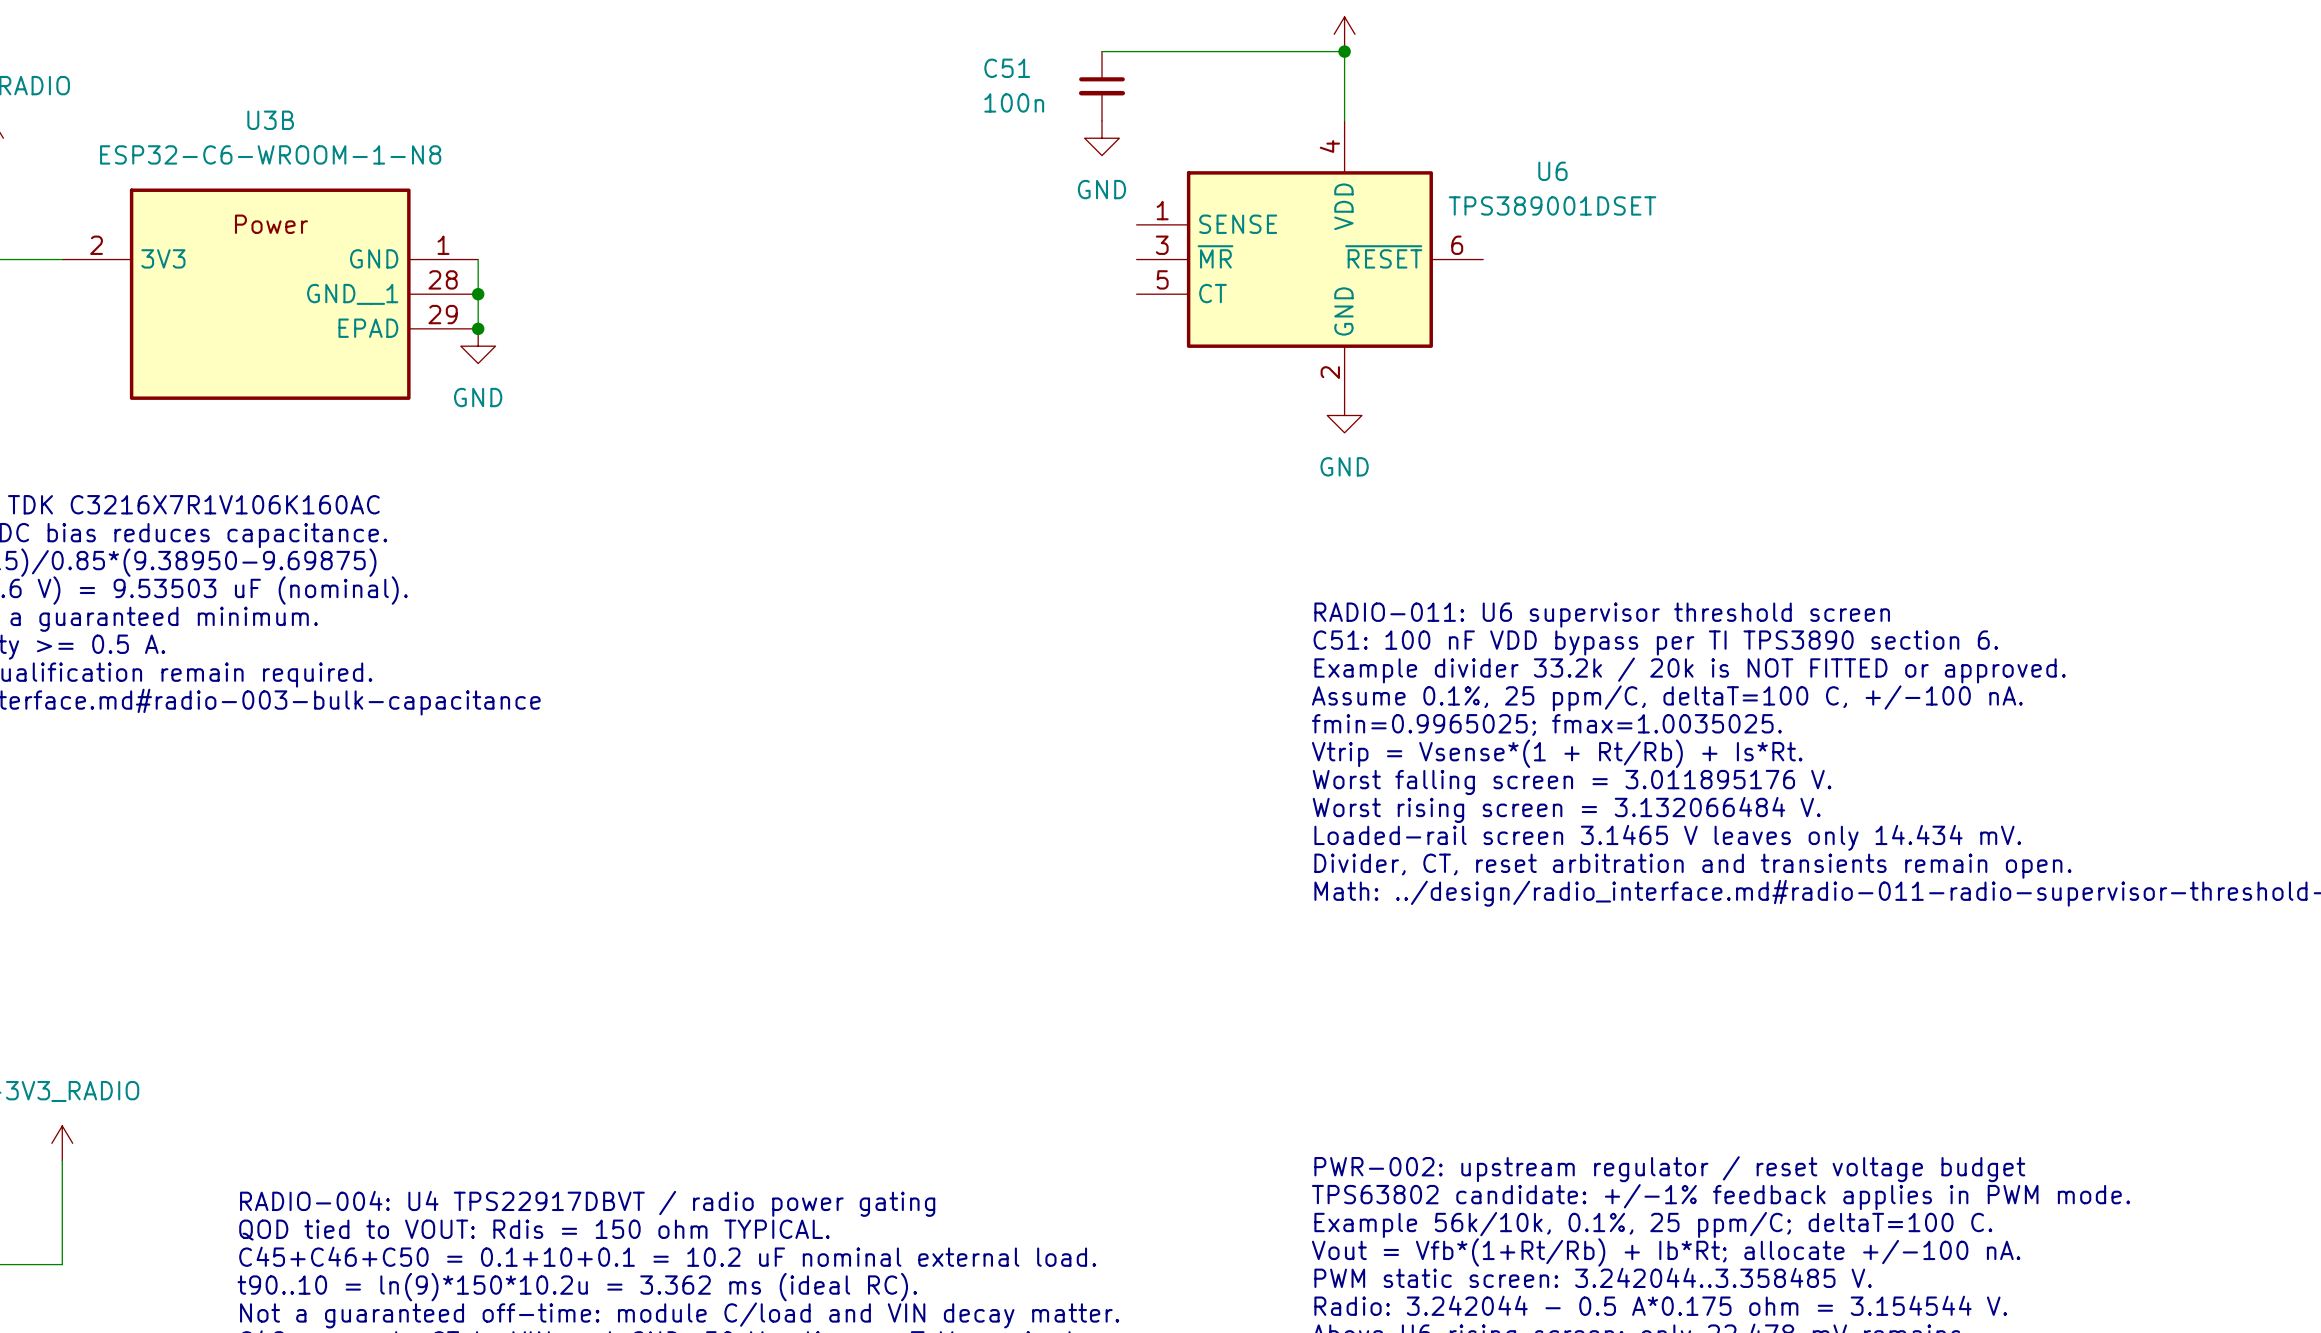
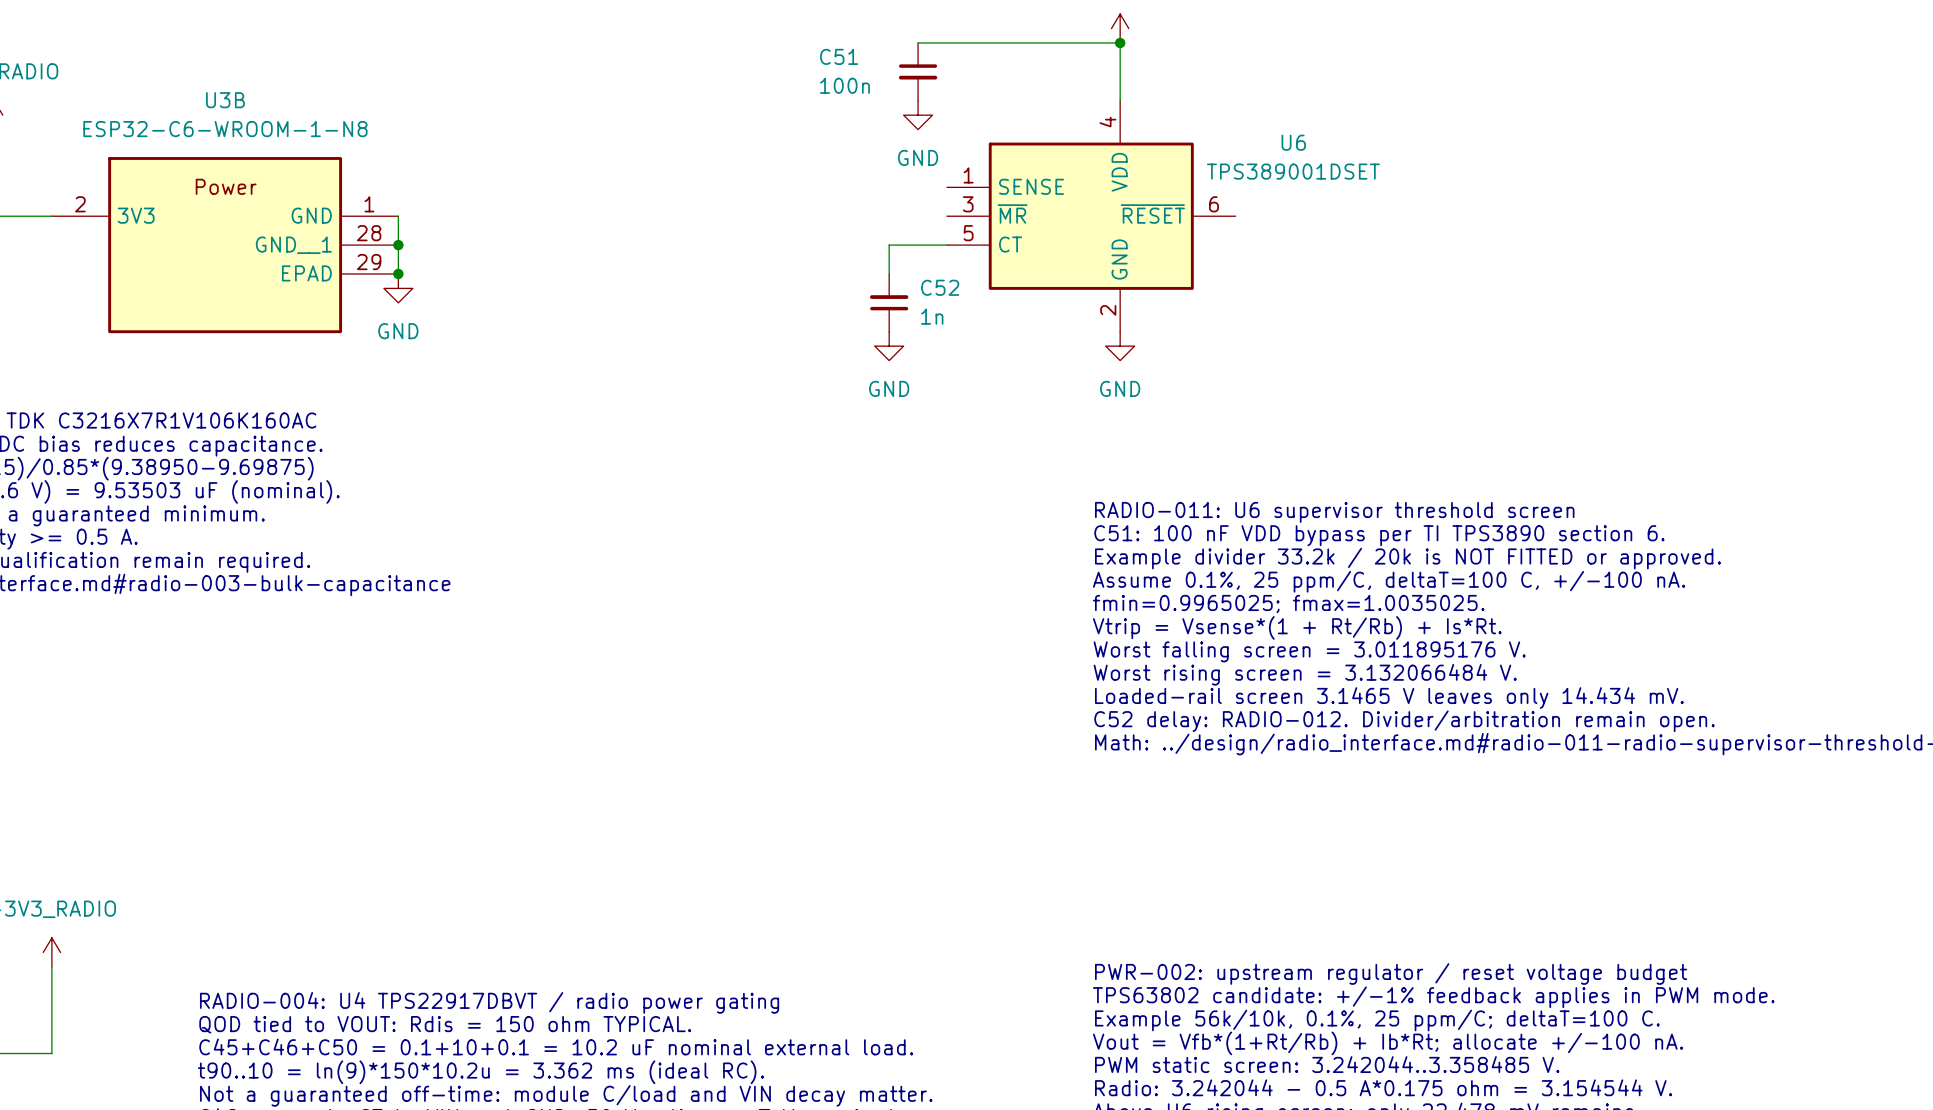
wire: none -> (946, 245) (889, 245) (889, 273)
C52: none -> 1n (889, 302)
power symbol: none -> GND (889, 346)
text: Divider, CT, reset arbitration and transients remain open. (1692, 866) -> C52 delay: RADIO-012. Divider/arbitration remain open. (1404, 721)

